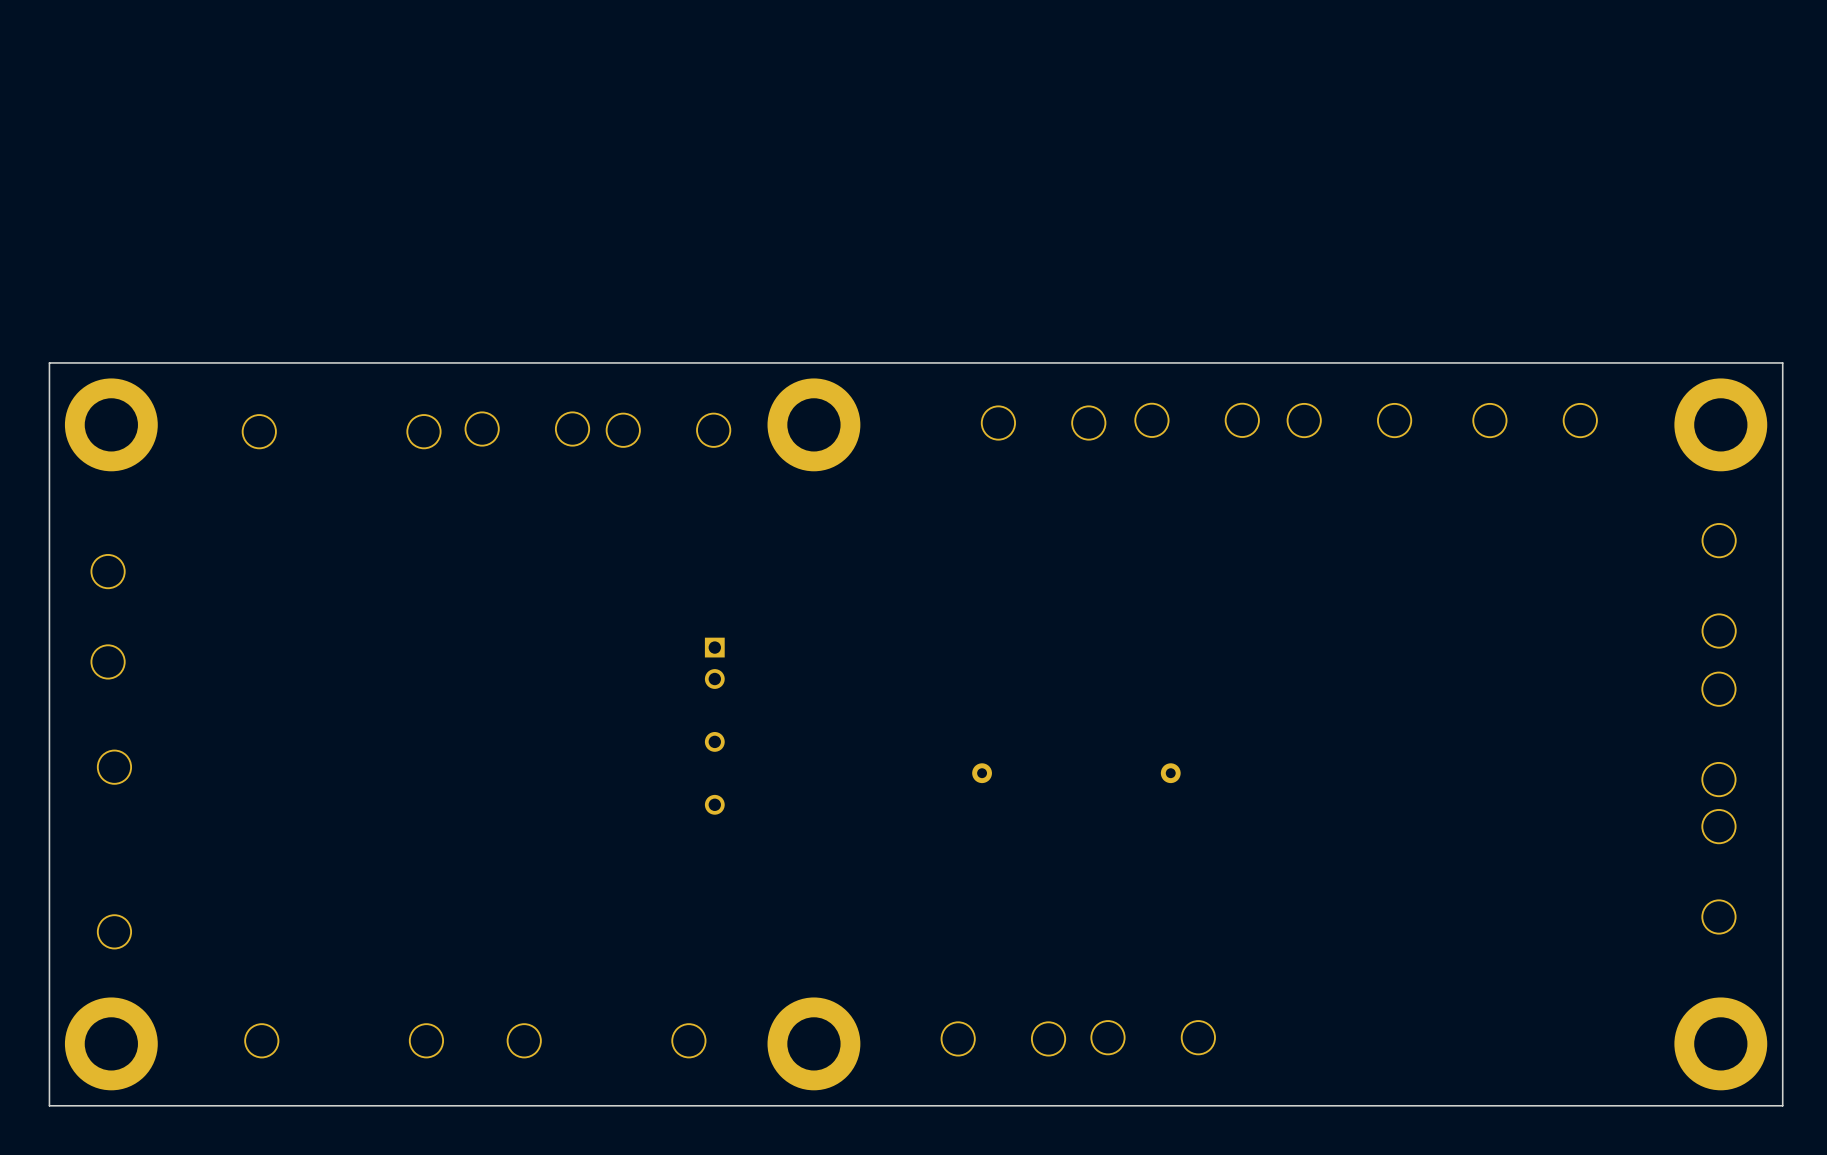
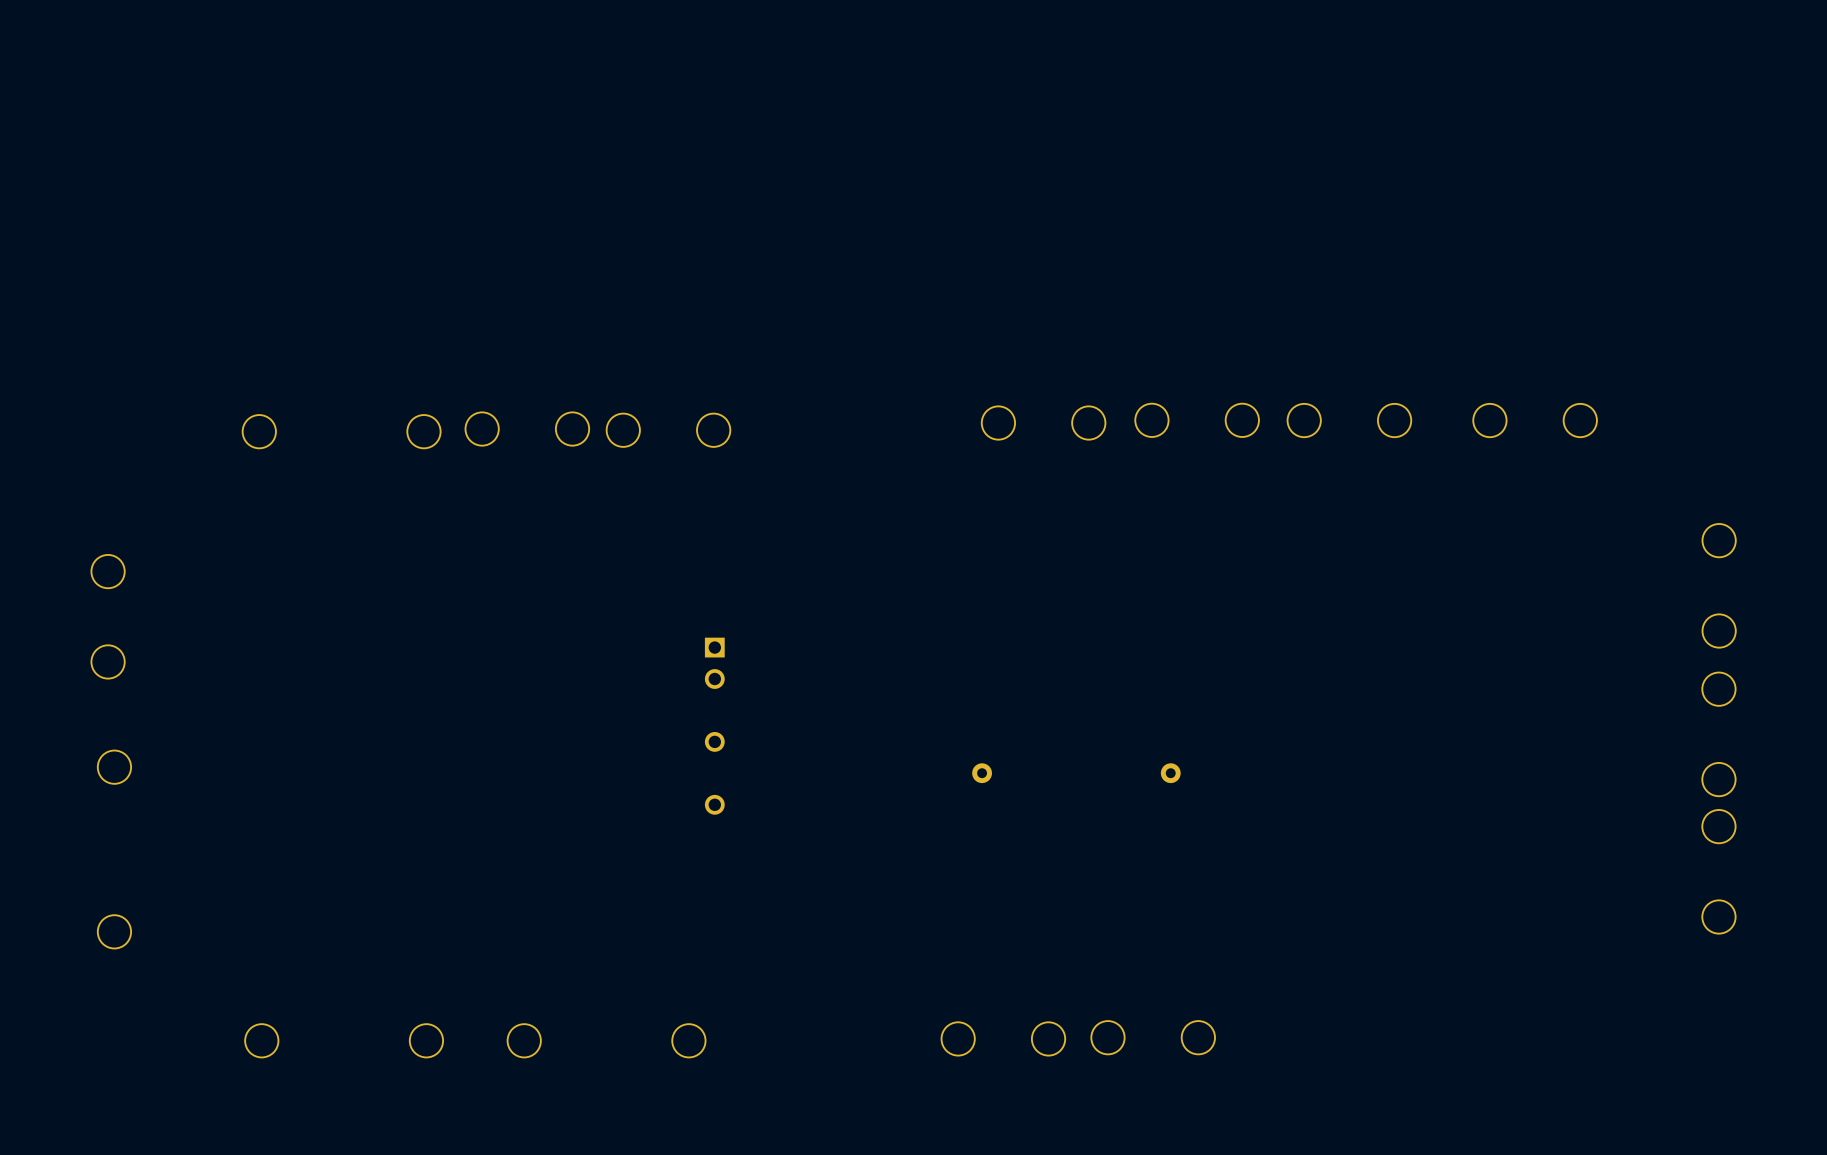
board edge: (1782, 362) (49, 362) (49, 1105) (1782, 1105) (1782, 362) -> none
part: (111, 424) -> none
part: (813, 424) -> none
part: (1720, 424) -> none
part: (111, 1043) -> none
part: (813, 1043) -> none
part: (1720, 1043) -> none

